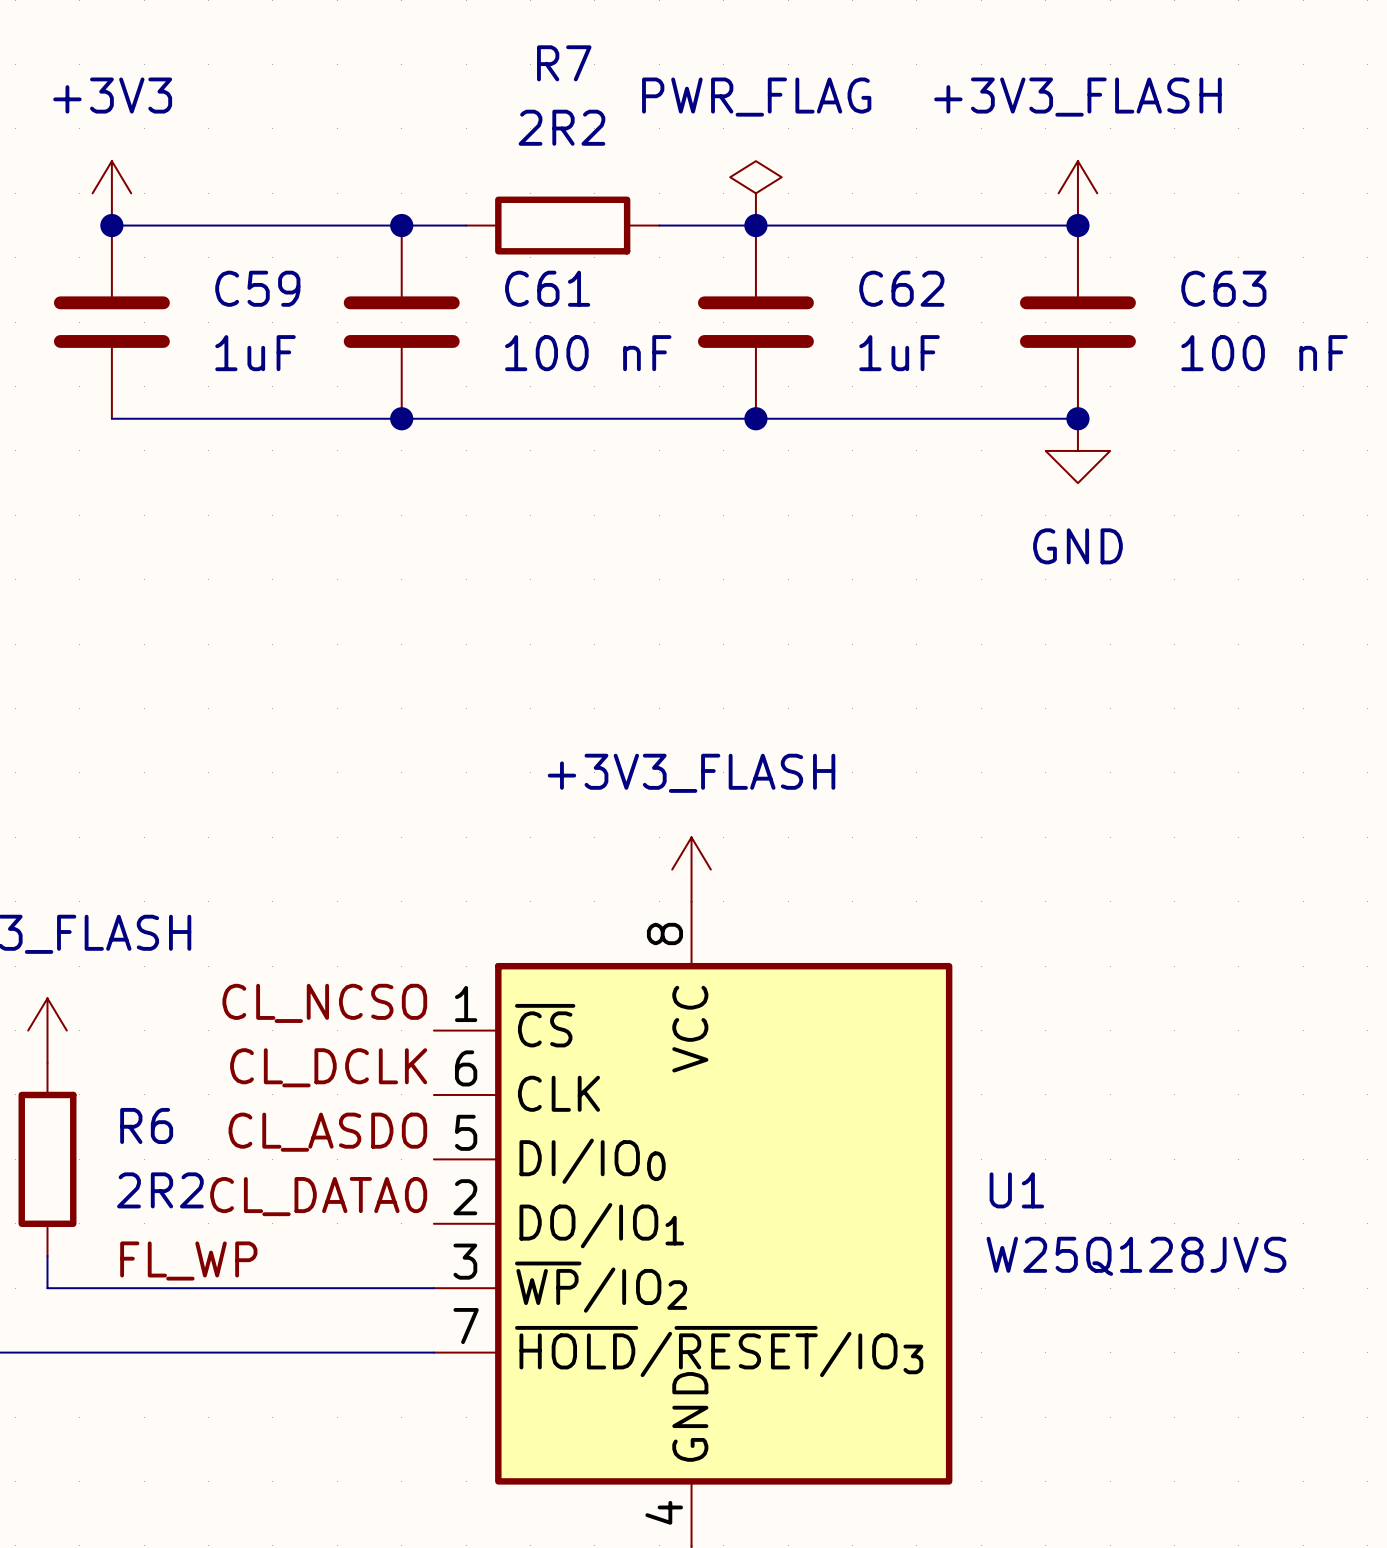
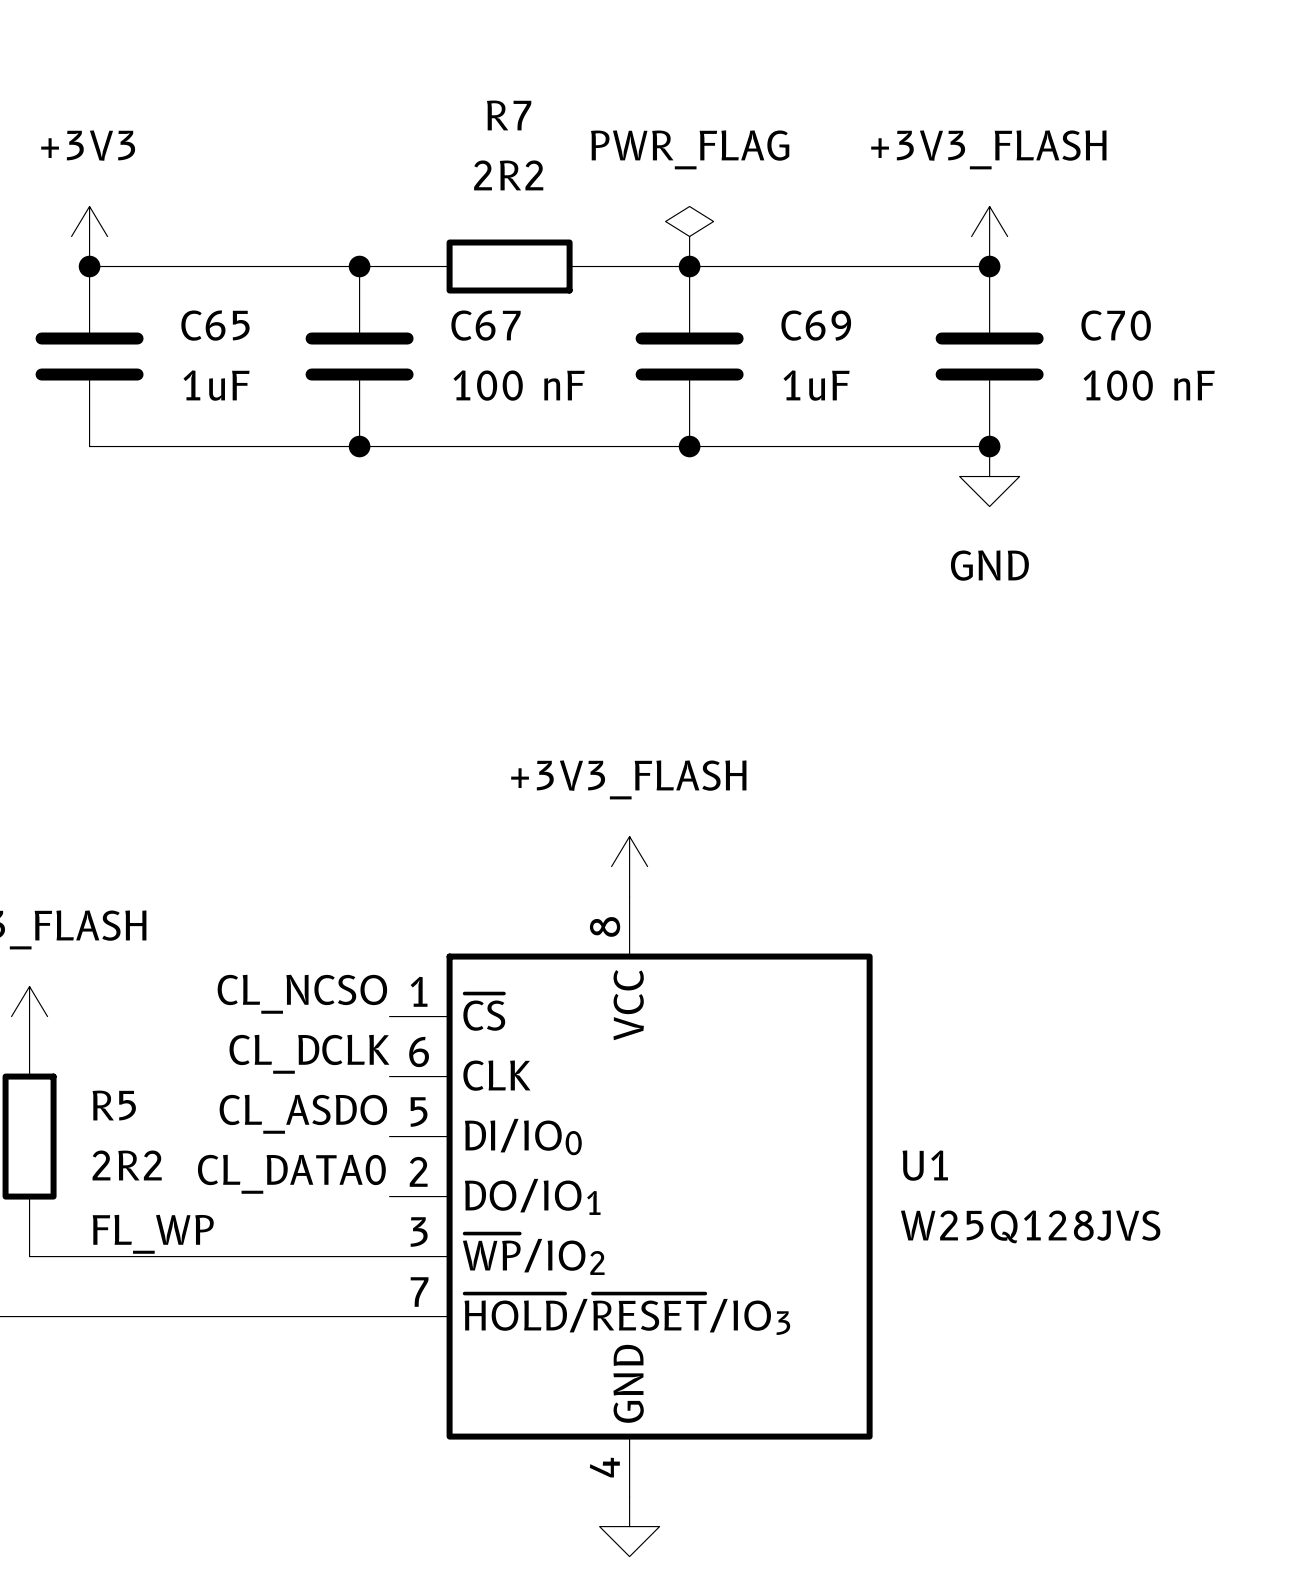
C59 name: C59 (257, 288) -> C65 (215, 325)
C61 name: C61 (547, 288) -> C67 (485, 325)
C62 name: C62 (901, 288) -> C69 (816, 325)
C63 name: C63 (1223, 288) -> C70 (1116, 325)
R6 name: R6 (146, 1125) -> R5 (114, 1105)

